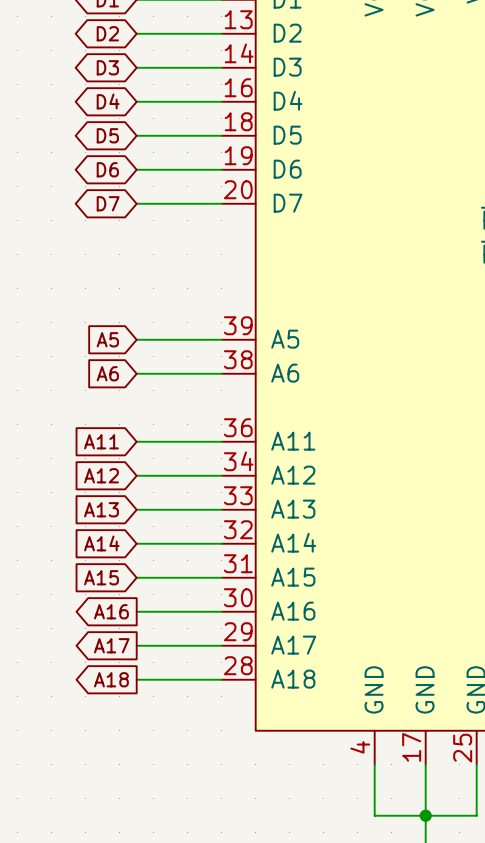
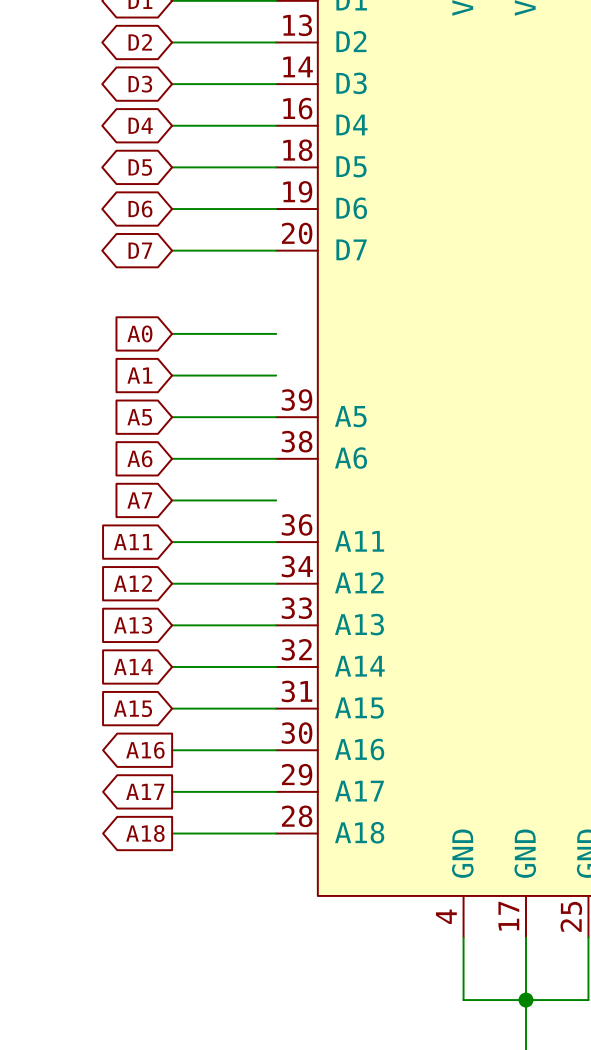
global label: none -> A0 (139, 333)
wire: none -> (172, 333) (276, 333)
global label: none -> A1 (139, 375)
wire: none -> (172, 375) (276, 375)
global label: none -> A7 (139, 500)
wire: none -> (172, 500) (276, 500)

